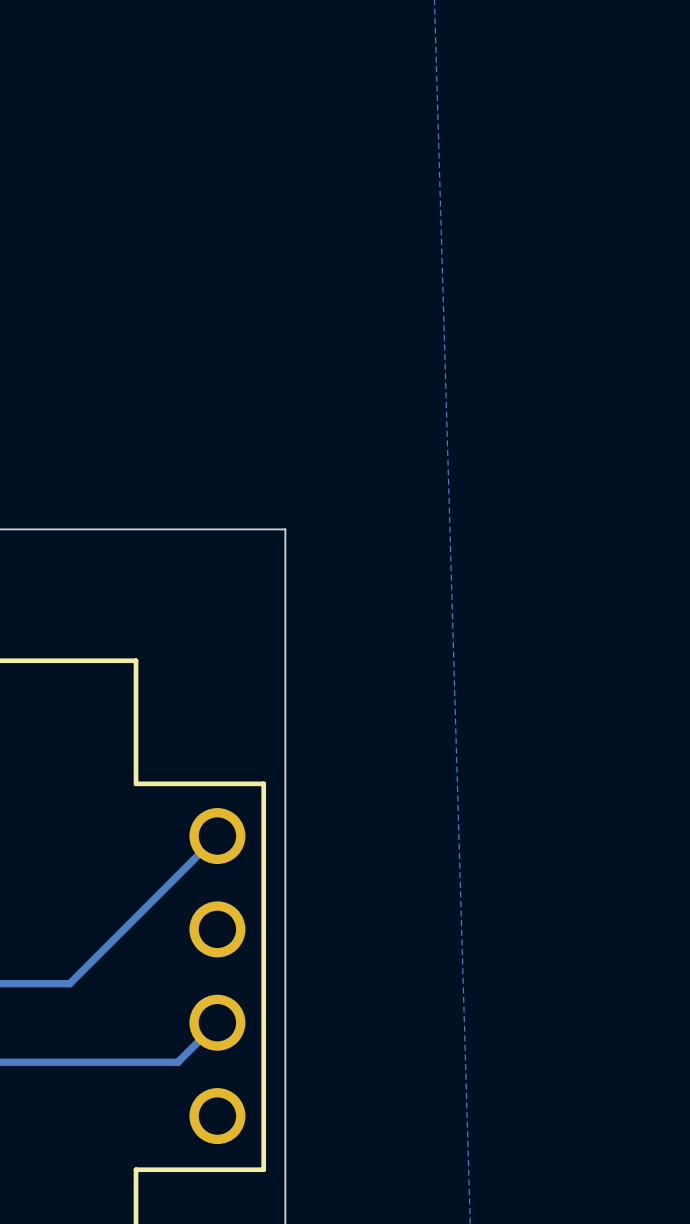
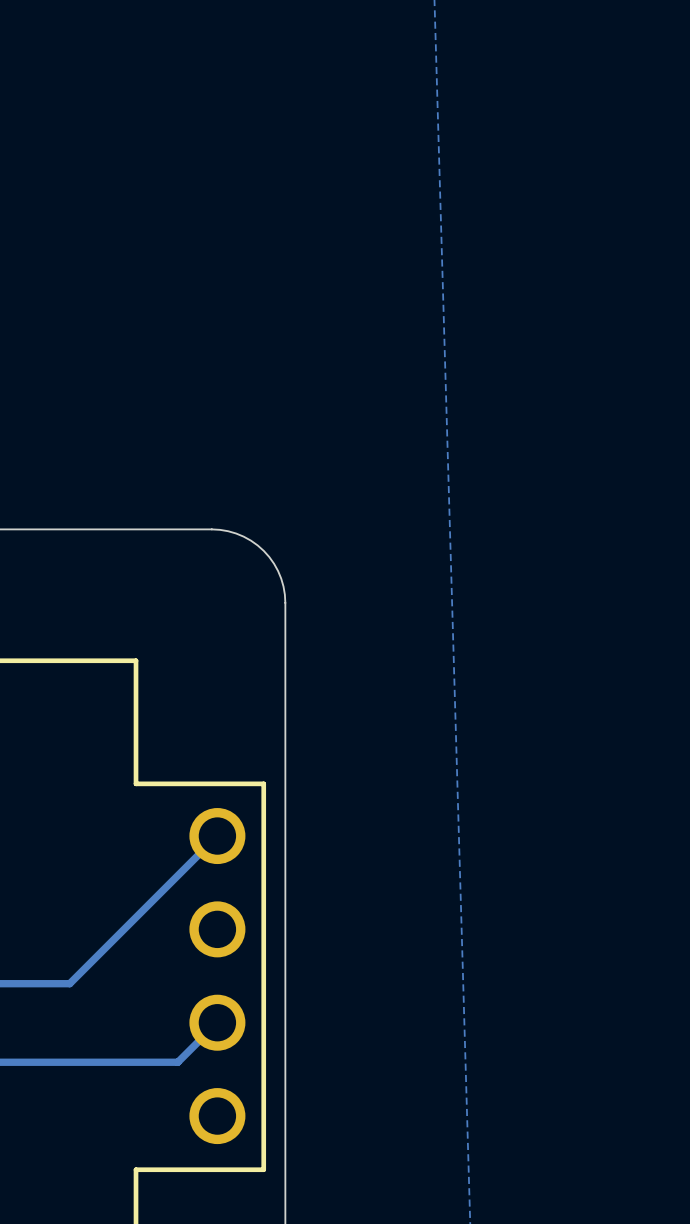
board edge: (211, 529) (285, 529) (285, 602) -> (211, 529) (236, 533) (250, 540) (263, 550) (278, 571) (283, 586) (285, 602)

